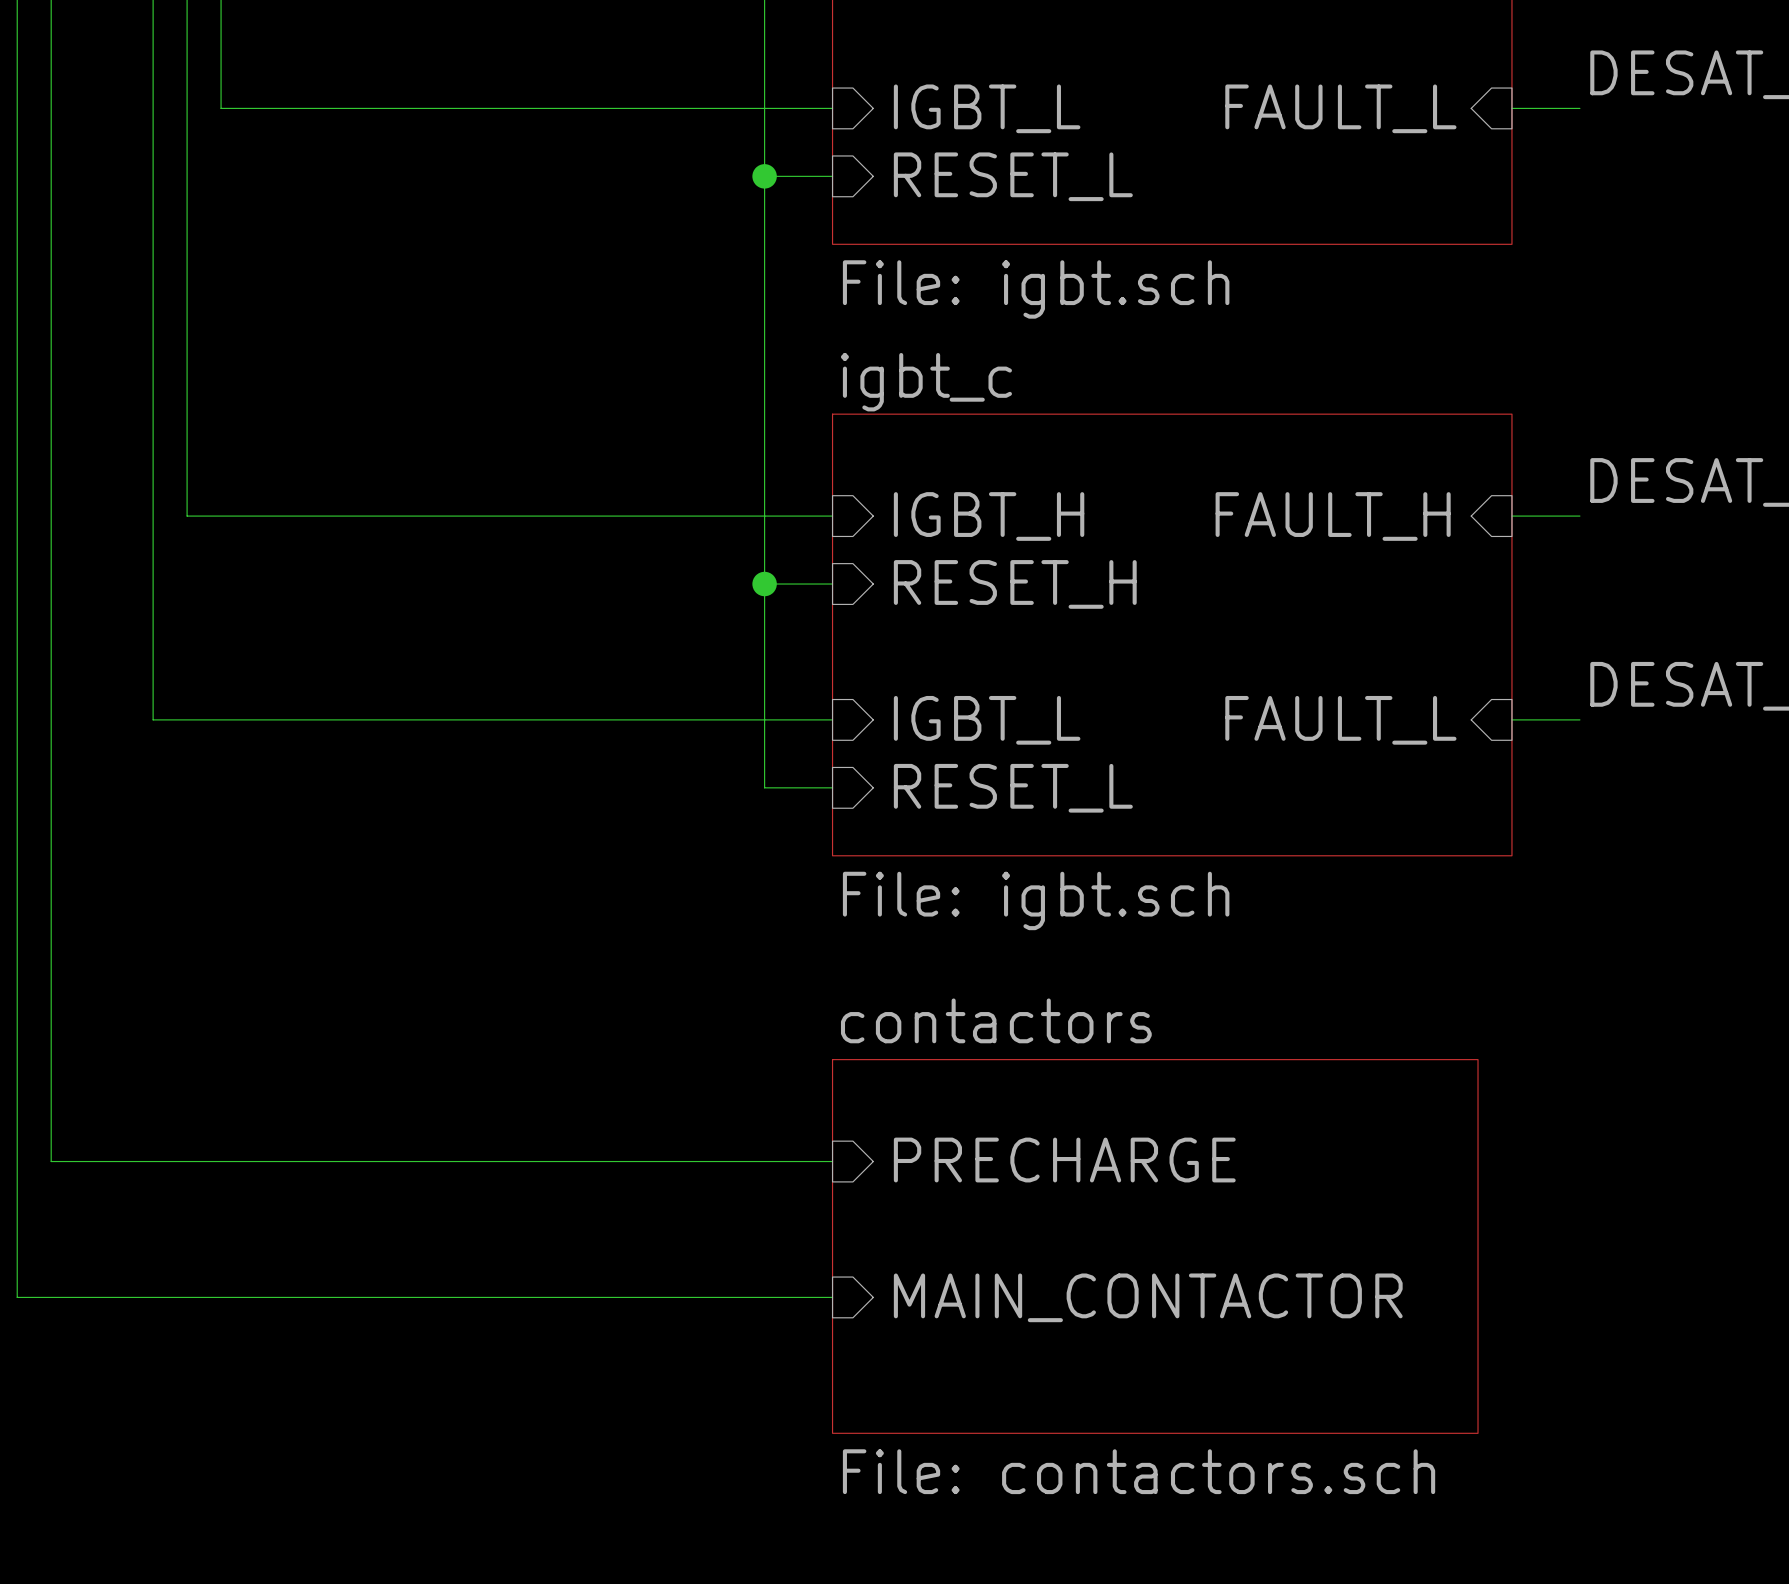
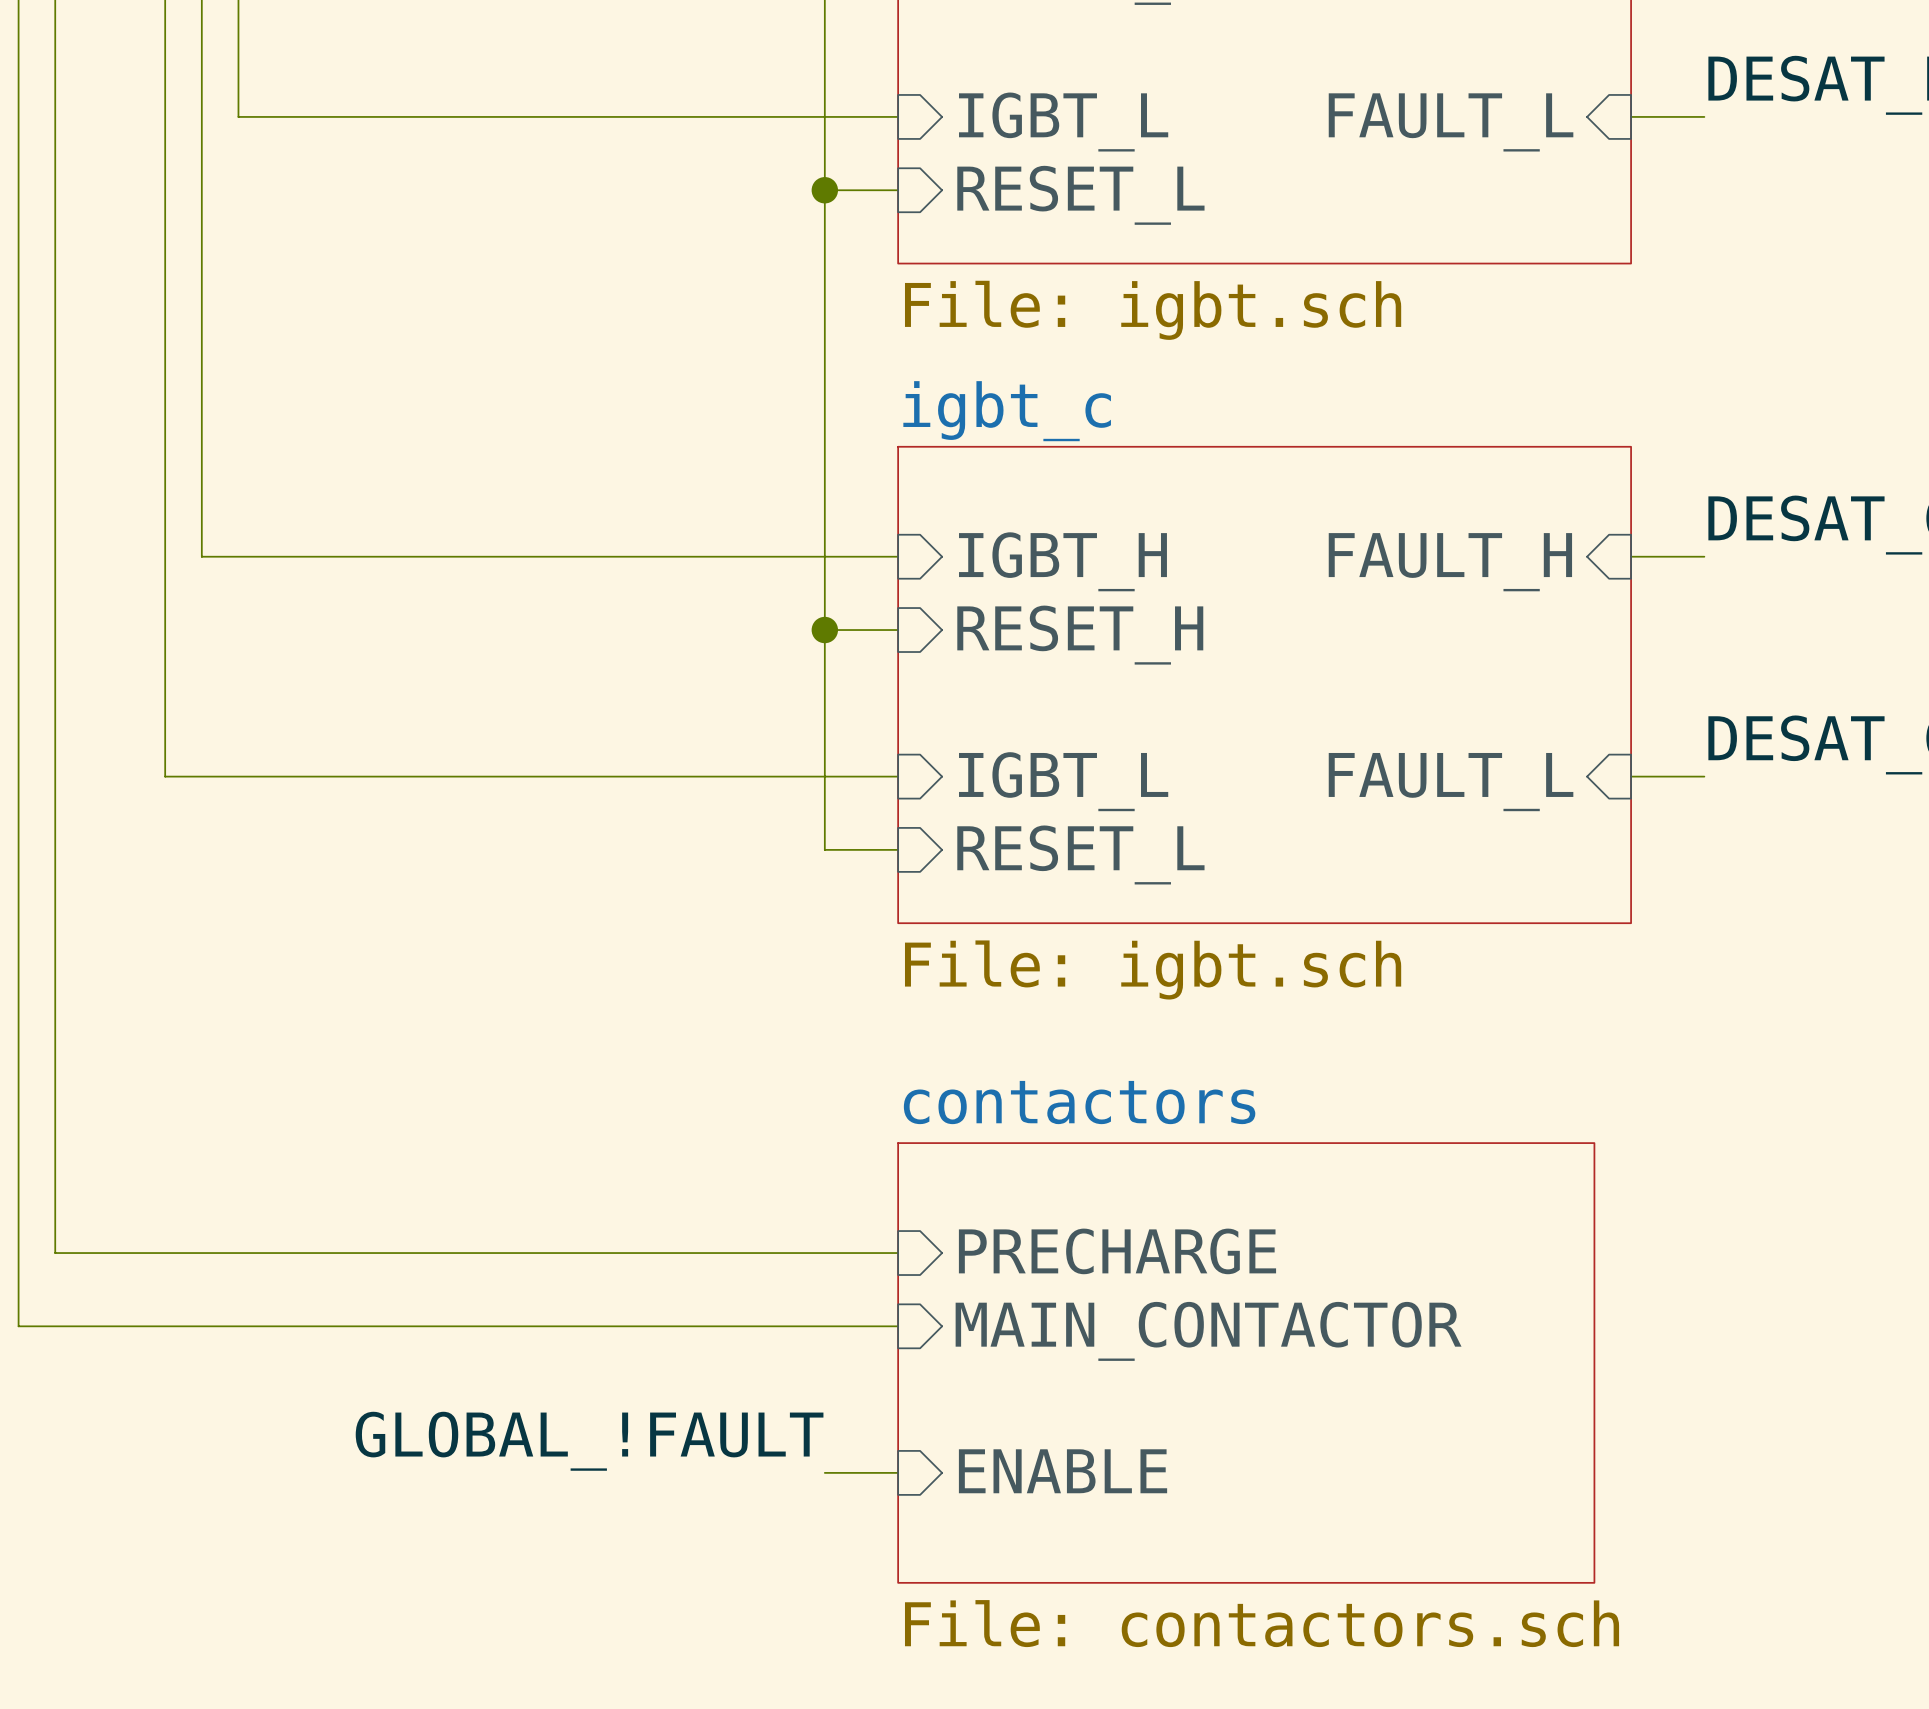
sheet contactors shape: [832, 1059, 1479, 1434] -> [898, 1143, 1595, 1583]
wire: (17, 1229) (17, 1297) (832, 1297) -> (18, 1326) (898, 1326)
sheet pin position: MAIN_CONTACTOR (1148, 1297) -> MAIN_CONTACTOR (1208, 1331)
label: none -> GLOBAL_!FAULT (589, 1441)
sheet pin: none -> ENABLE (1063, 1471)
wire: none -> (824, 1472) (898, 1472)

